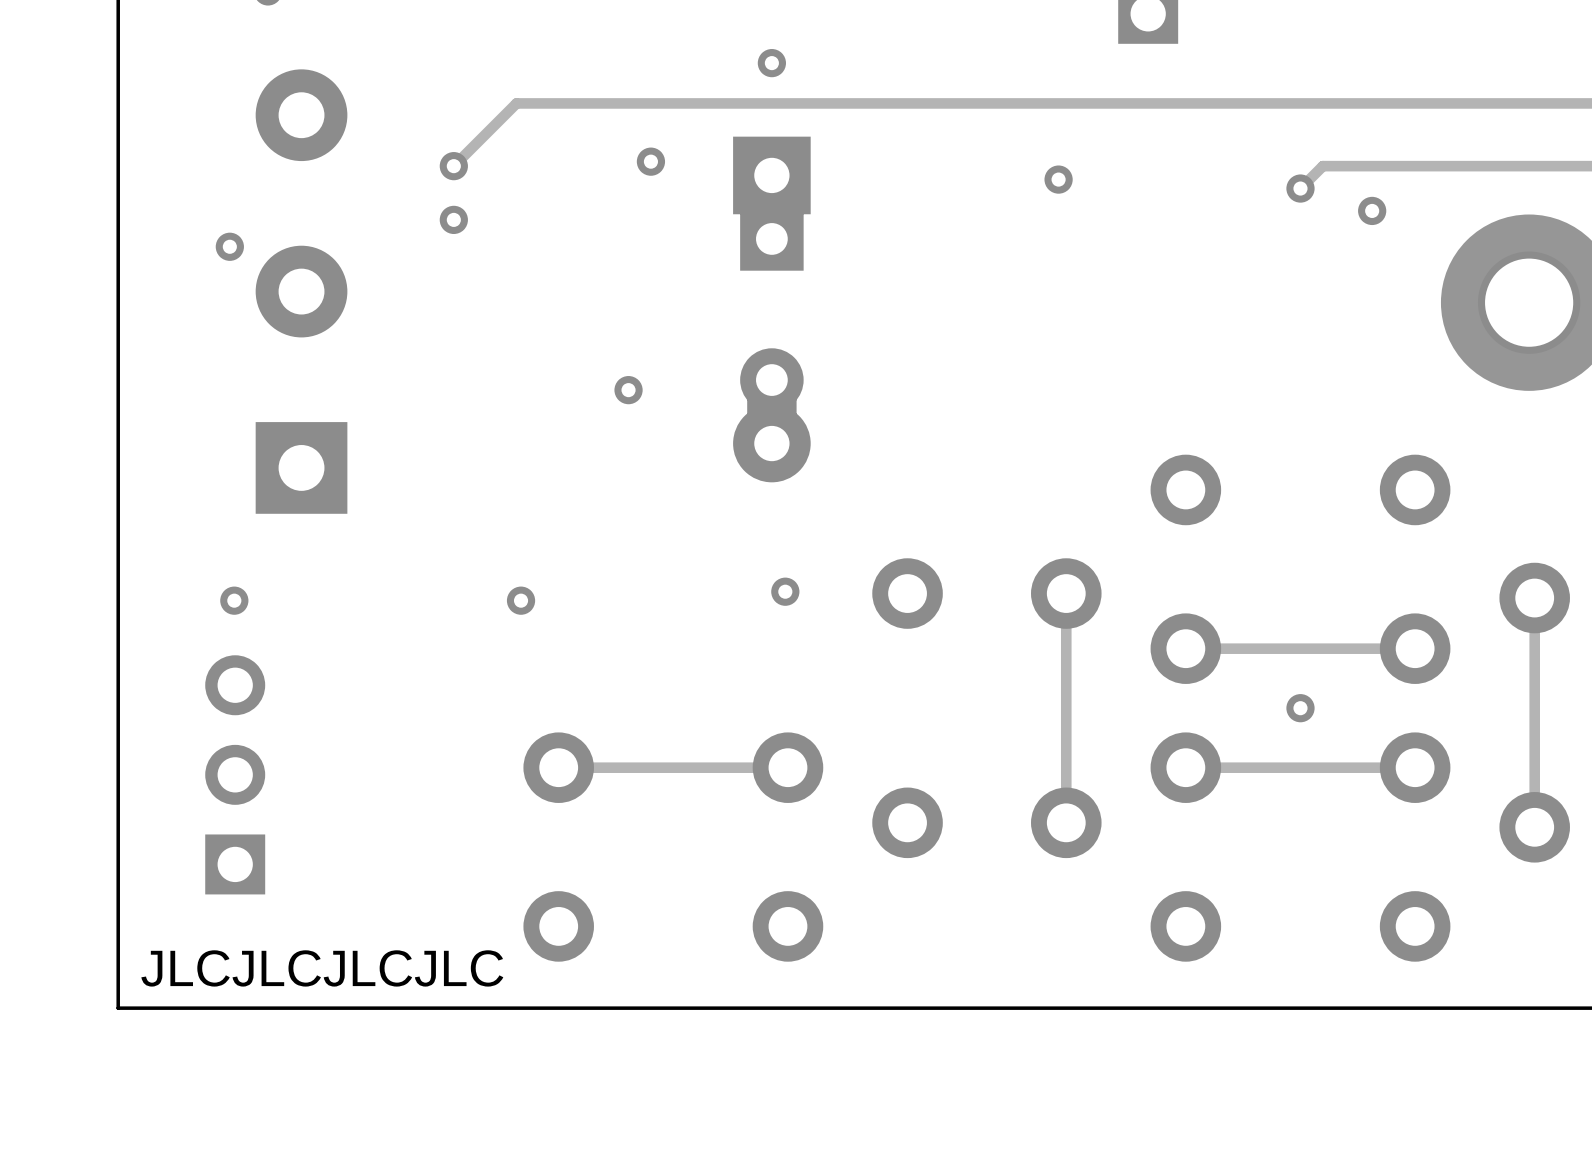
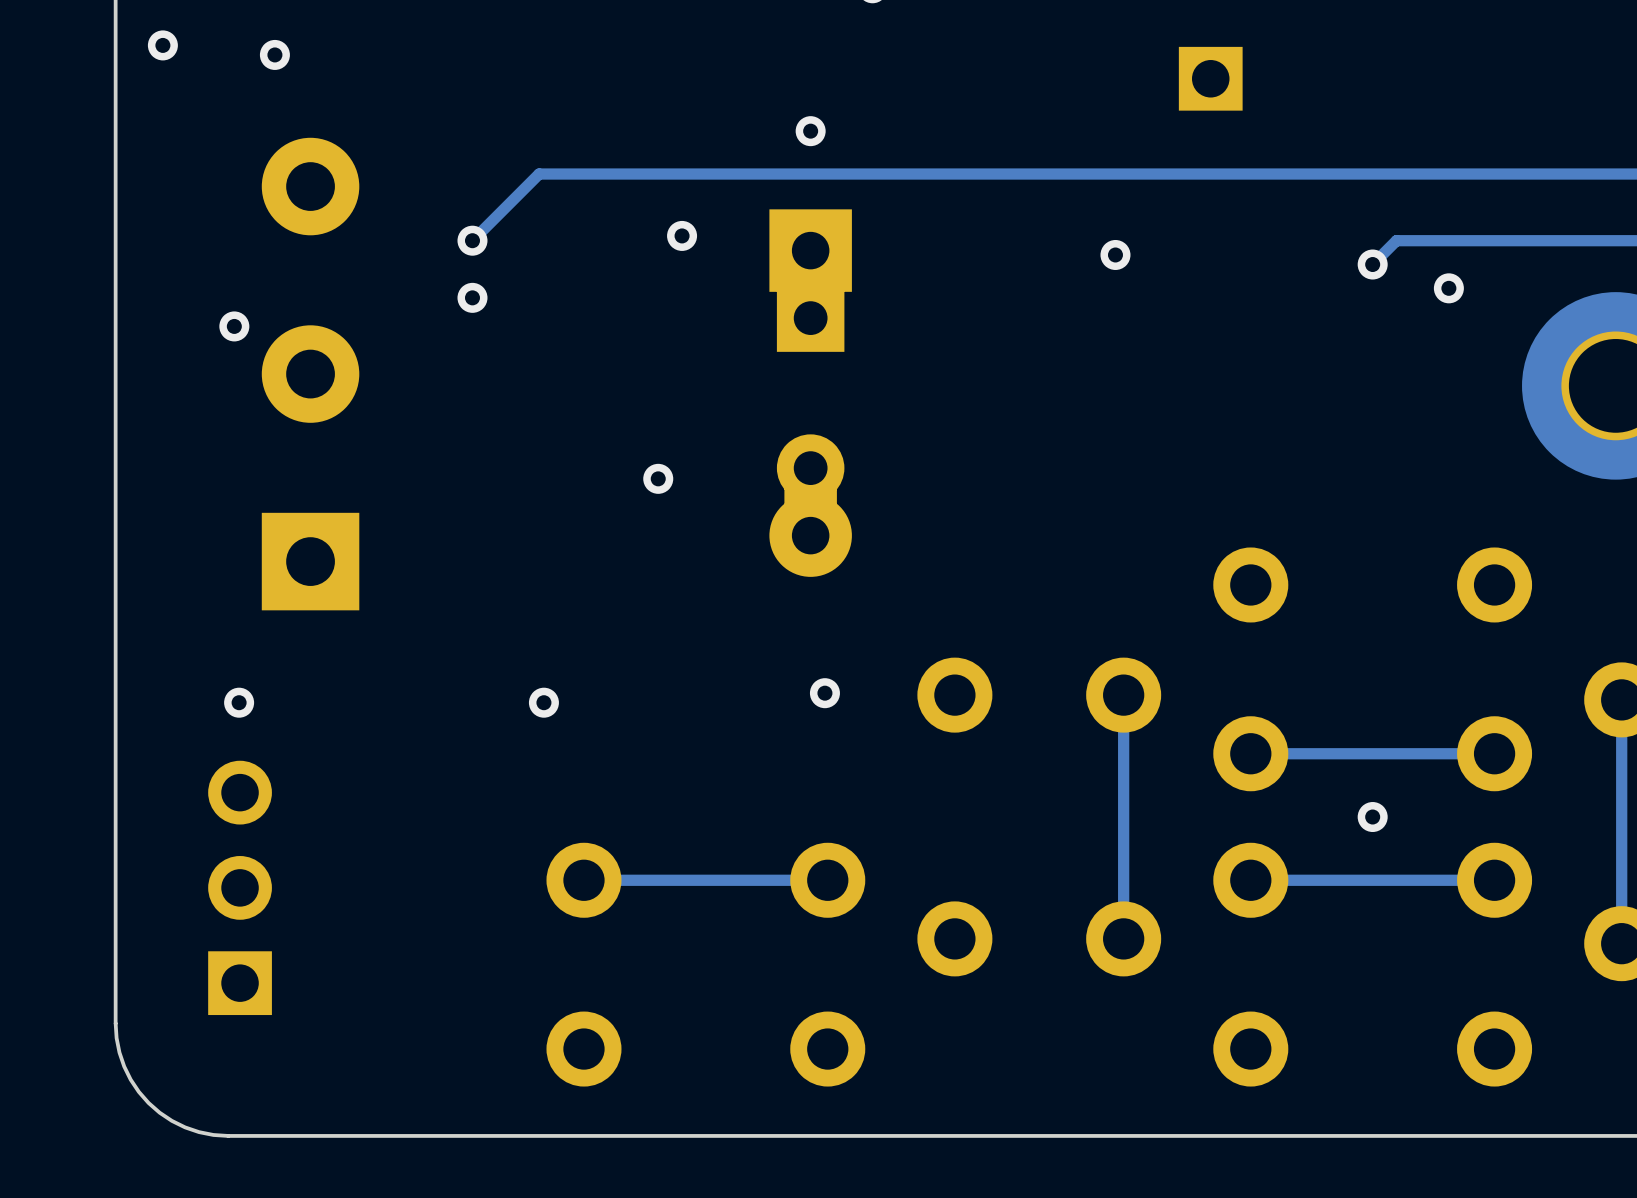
board edge: (118, 902) (118, 1008) (224, 1008) -> (115, 1023) (116, 1038) (124, 1066) (130, 1079) (148, 1102) (171, 1120) (185, 1127) (213, 1134) (228, 1135)
text: JLCJLCJLCJLC (322, 968) -> none

